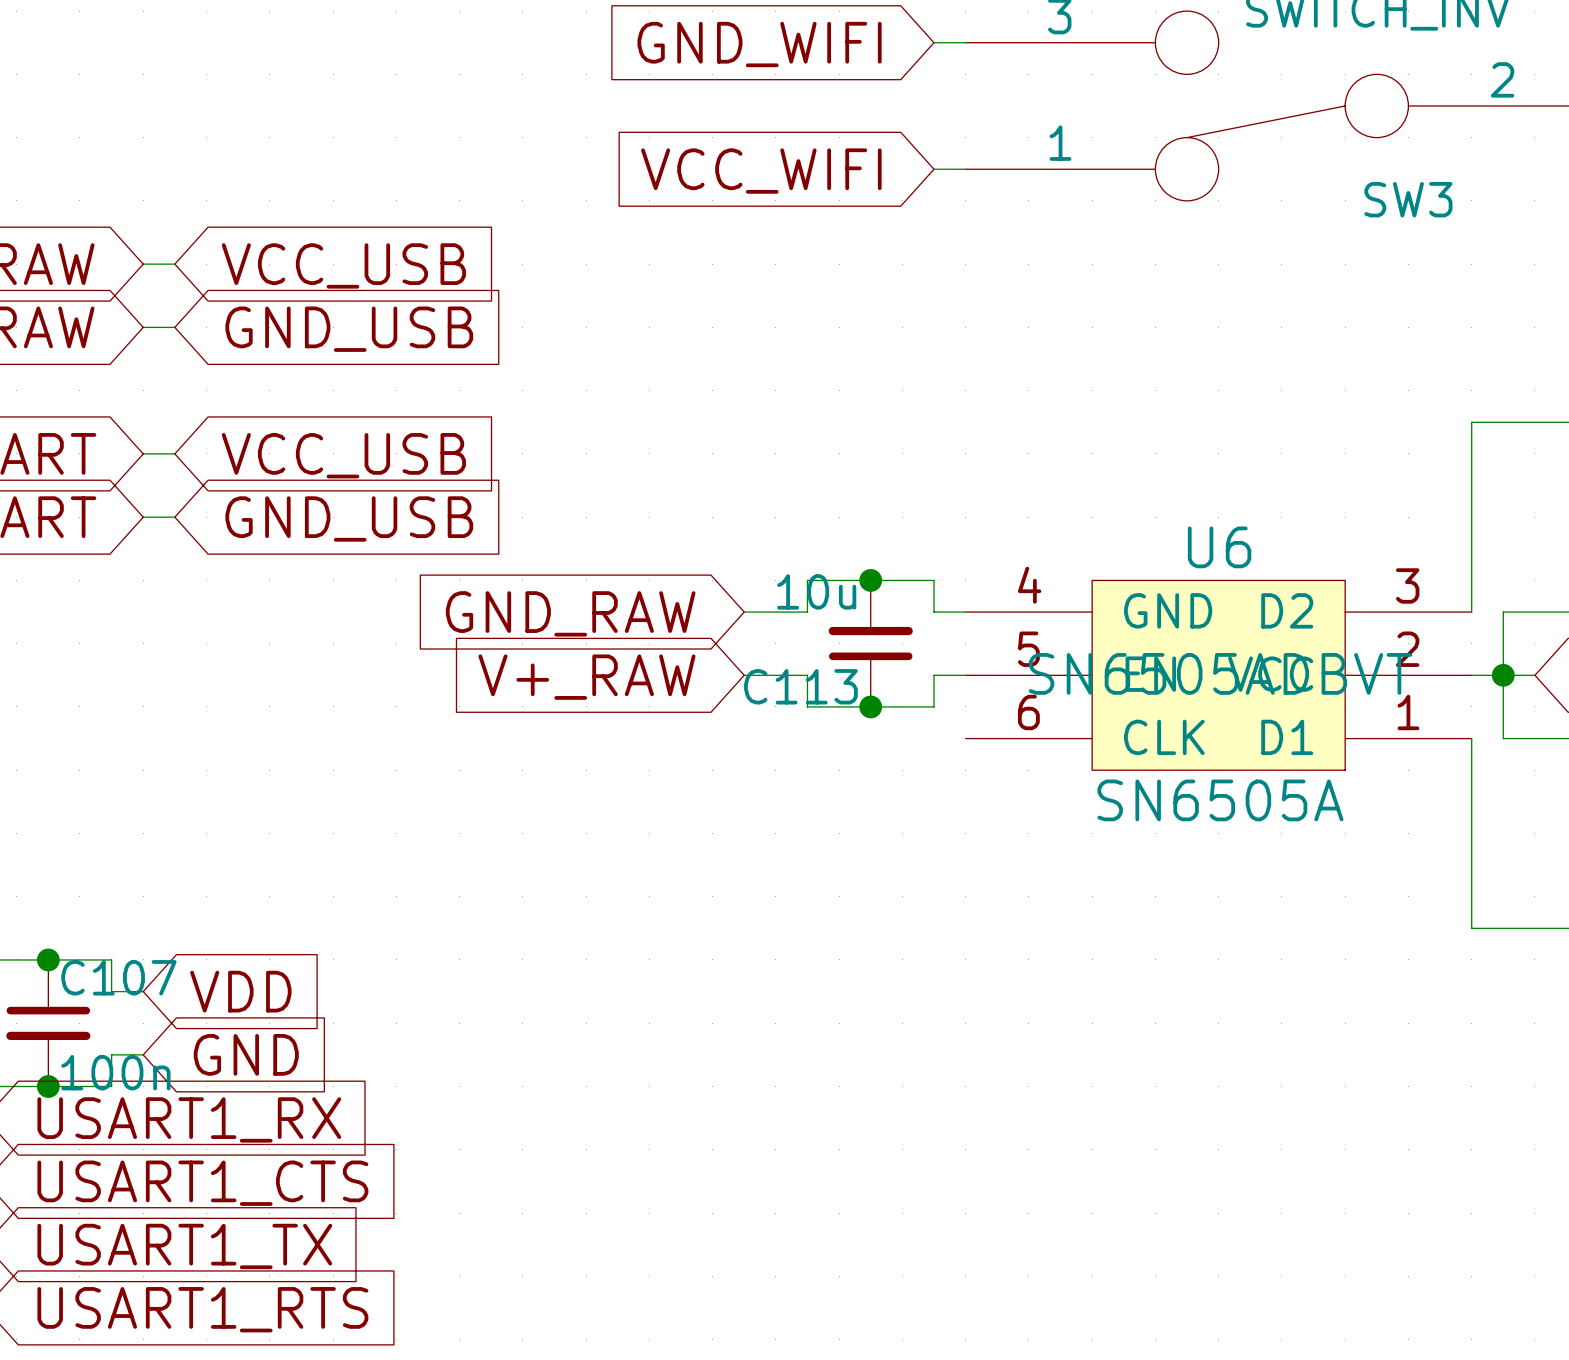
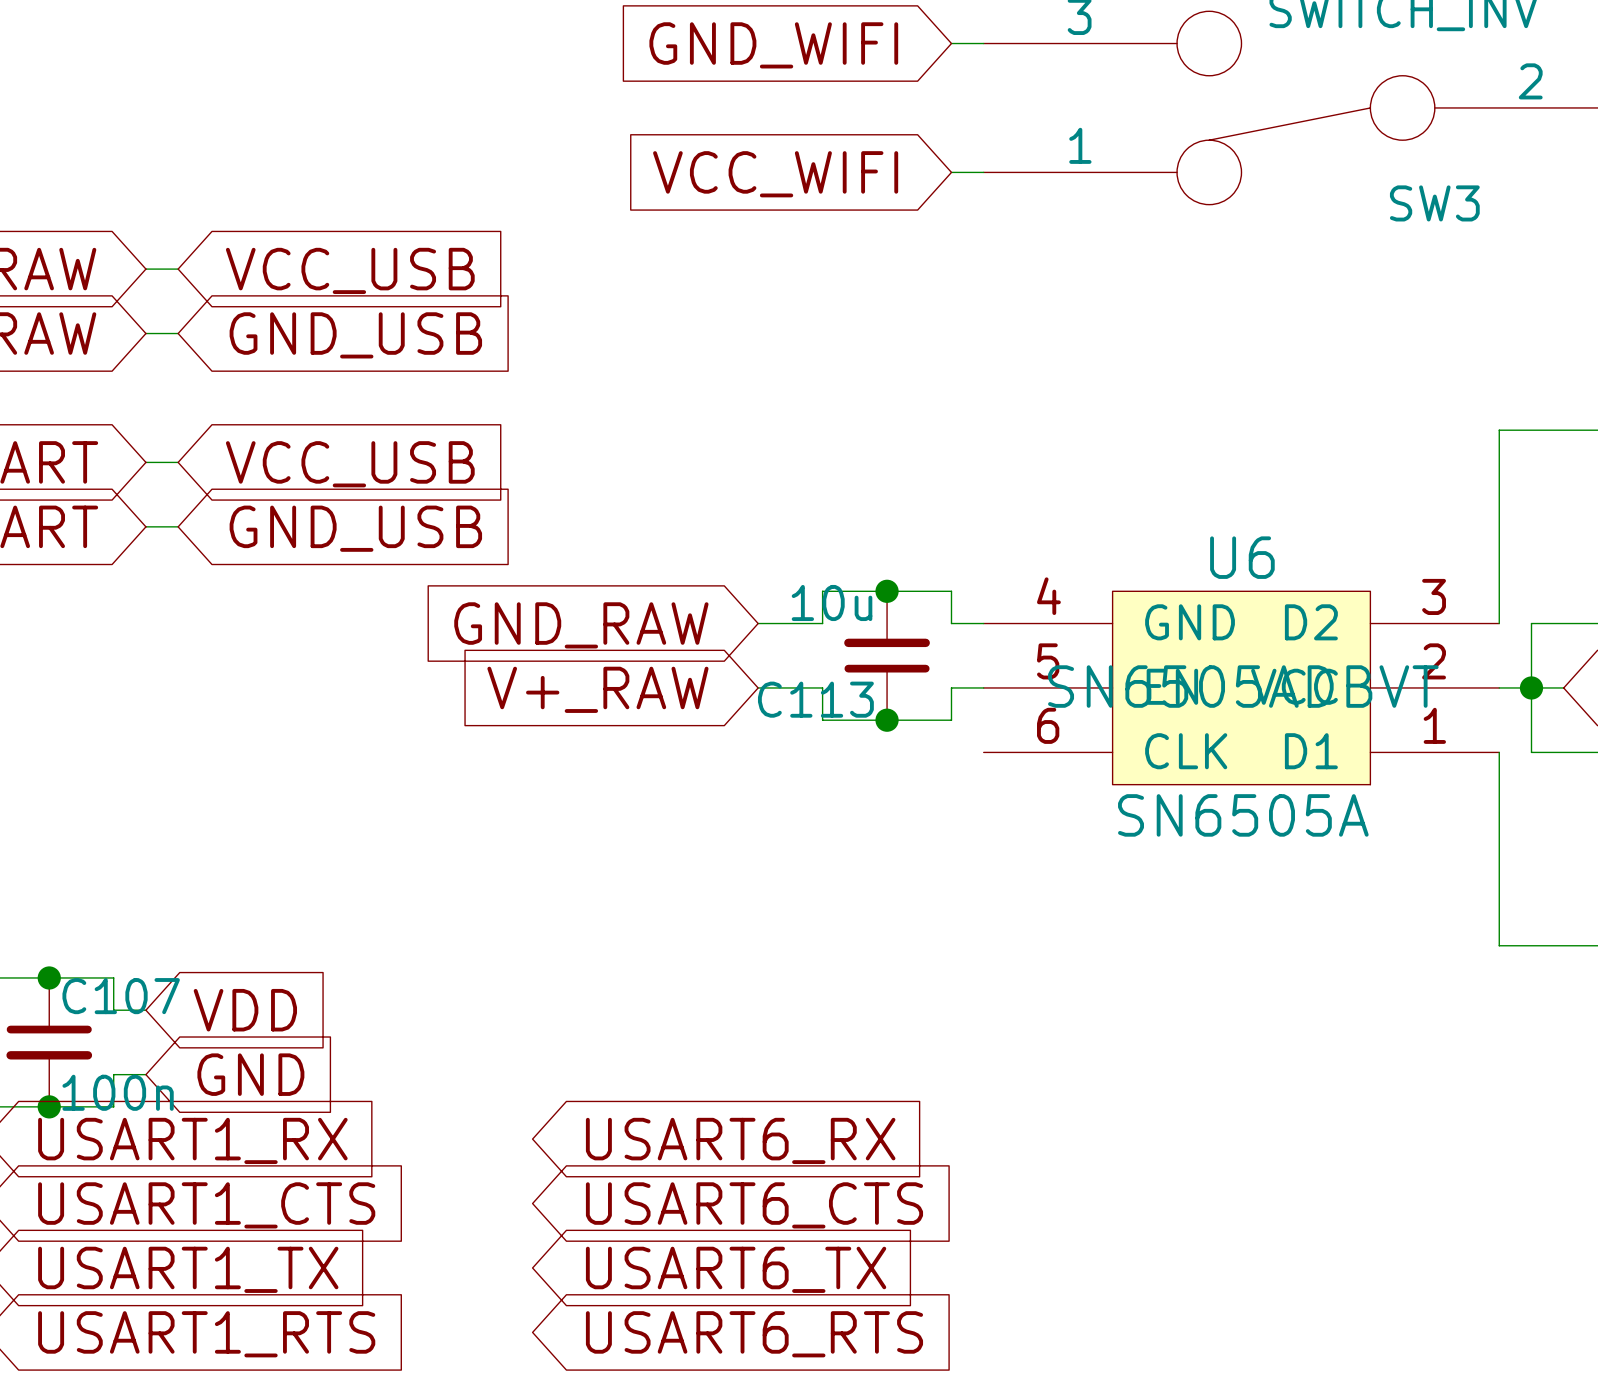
global label: none -> USART6_RX (740, 1140)
global label: none -> USART6_CTS (754, 1205)
global label: none -> USART6_TX (736, 1269)
global label: none -> USART6_RTS (754, 1334)

